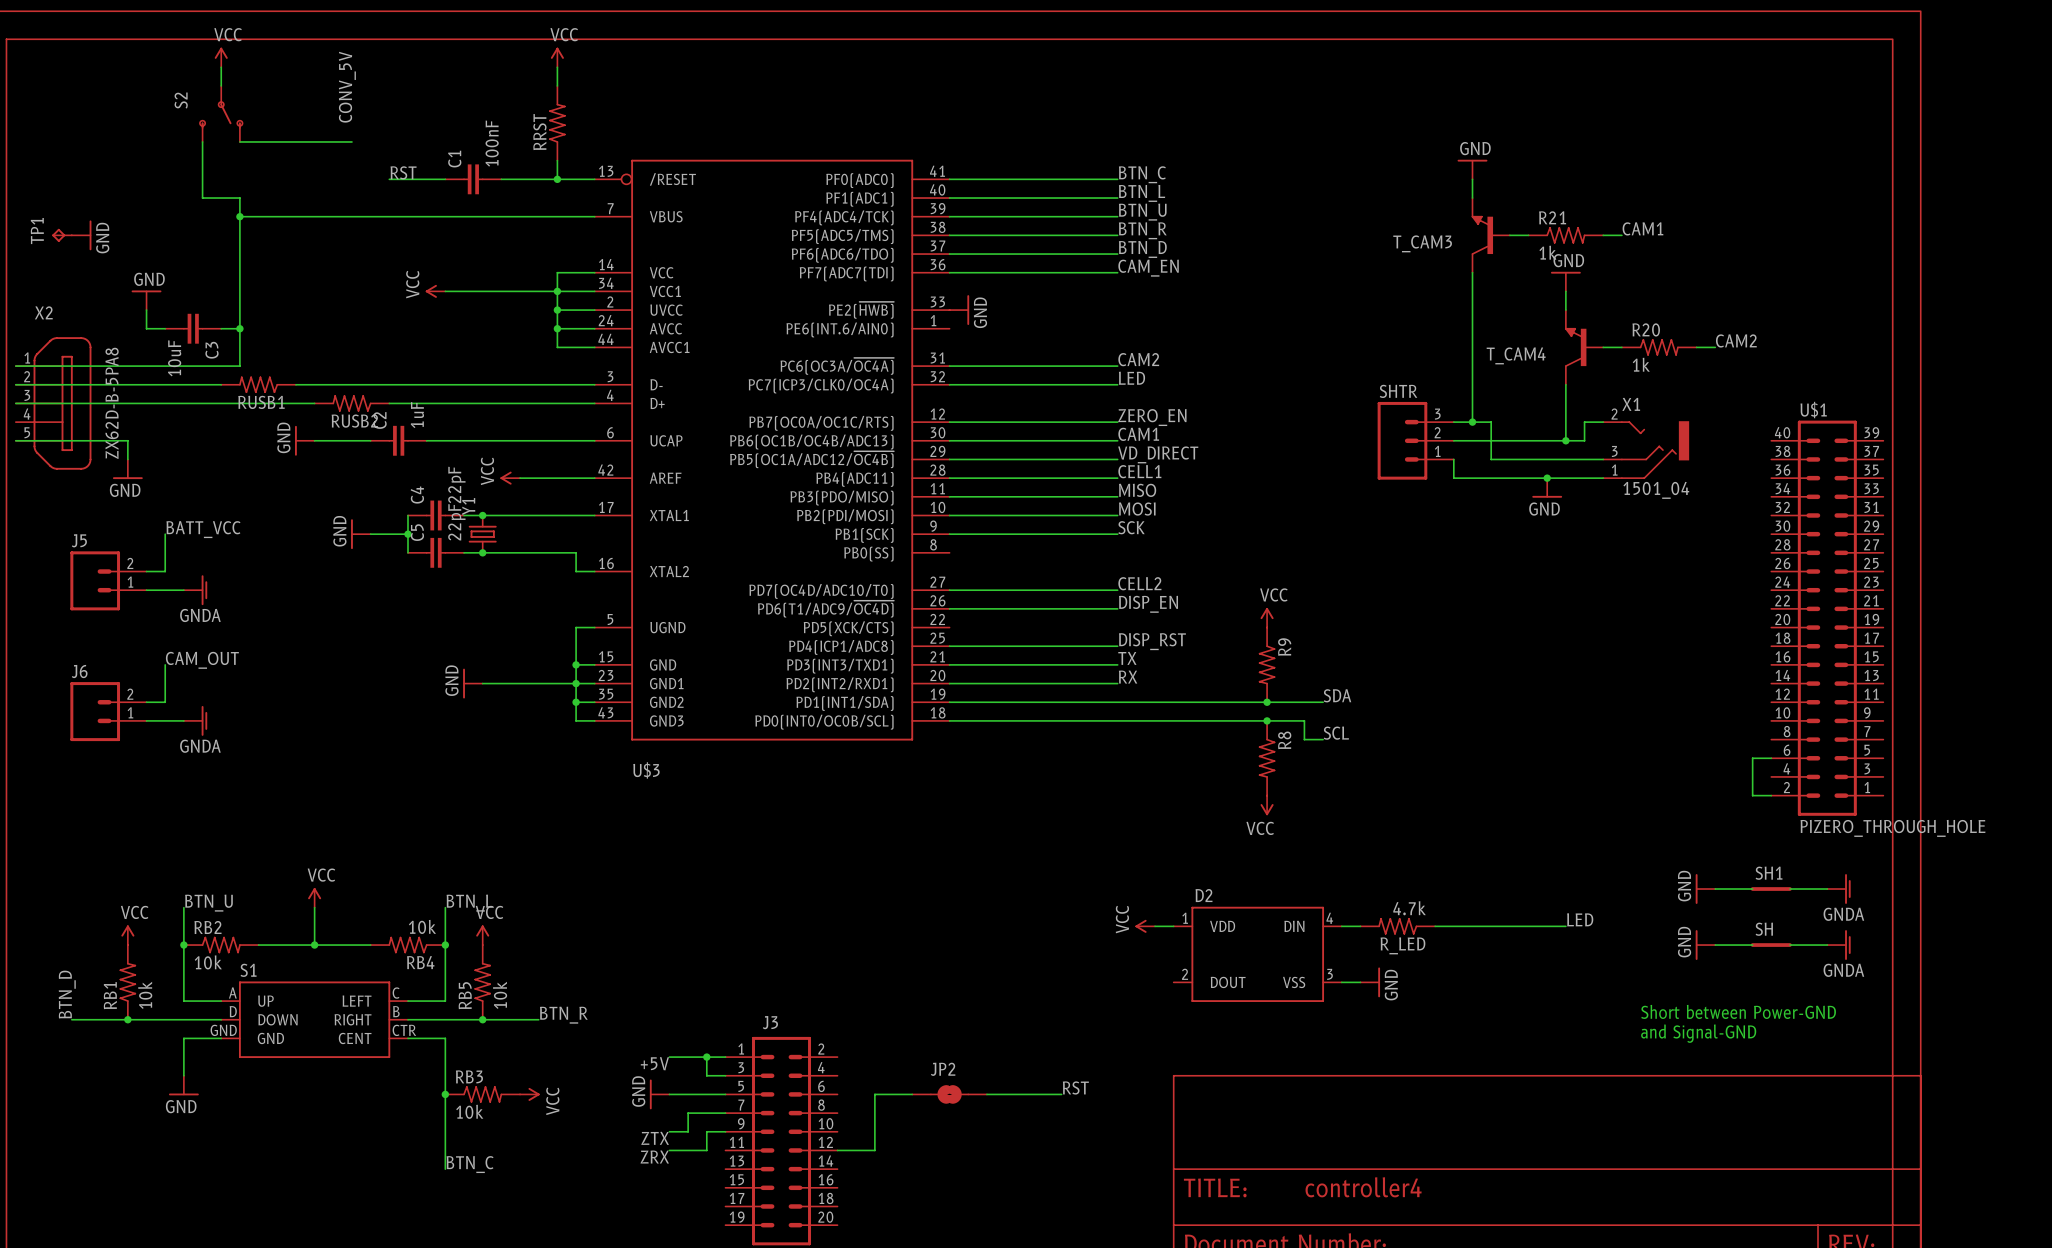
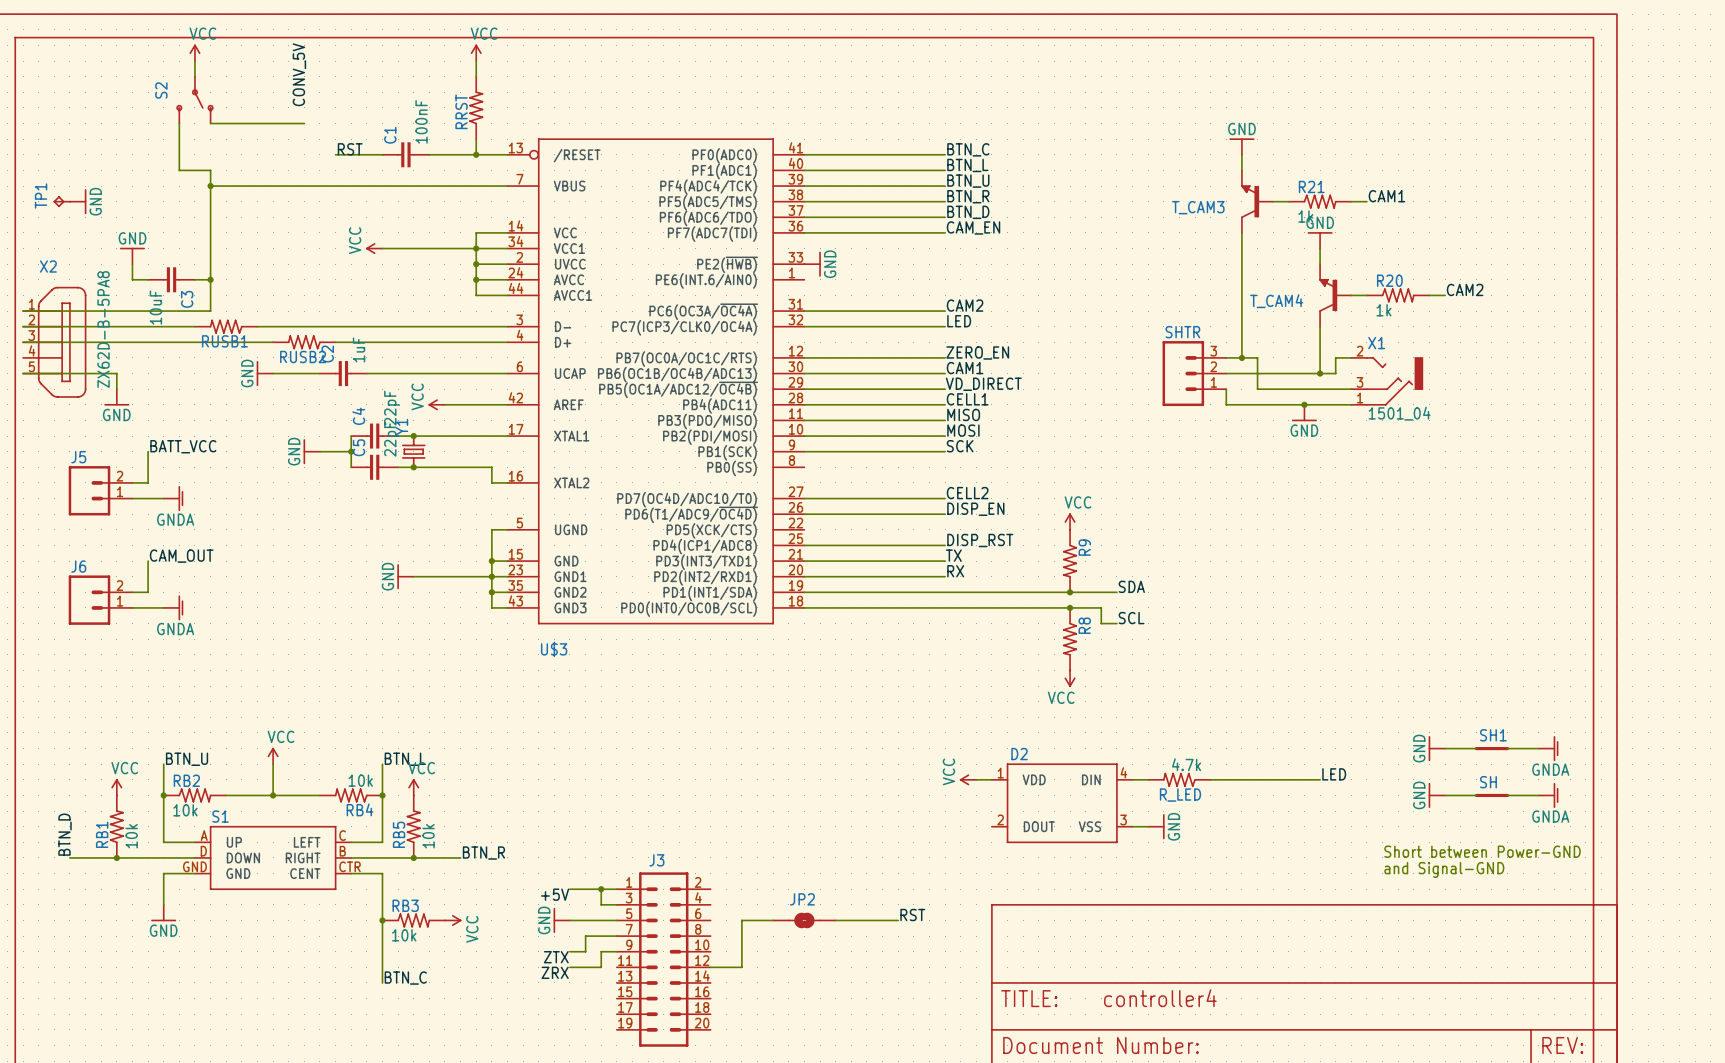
U$1: PIZERO_THROUGH_HOLE (1827, 618) -> none
wire: (1771, 758) (1752, 758) (1752, 795) (1771, 795) -> none

